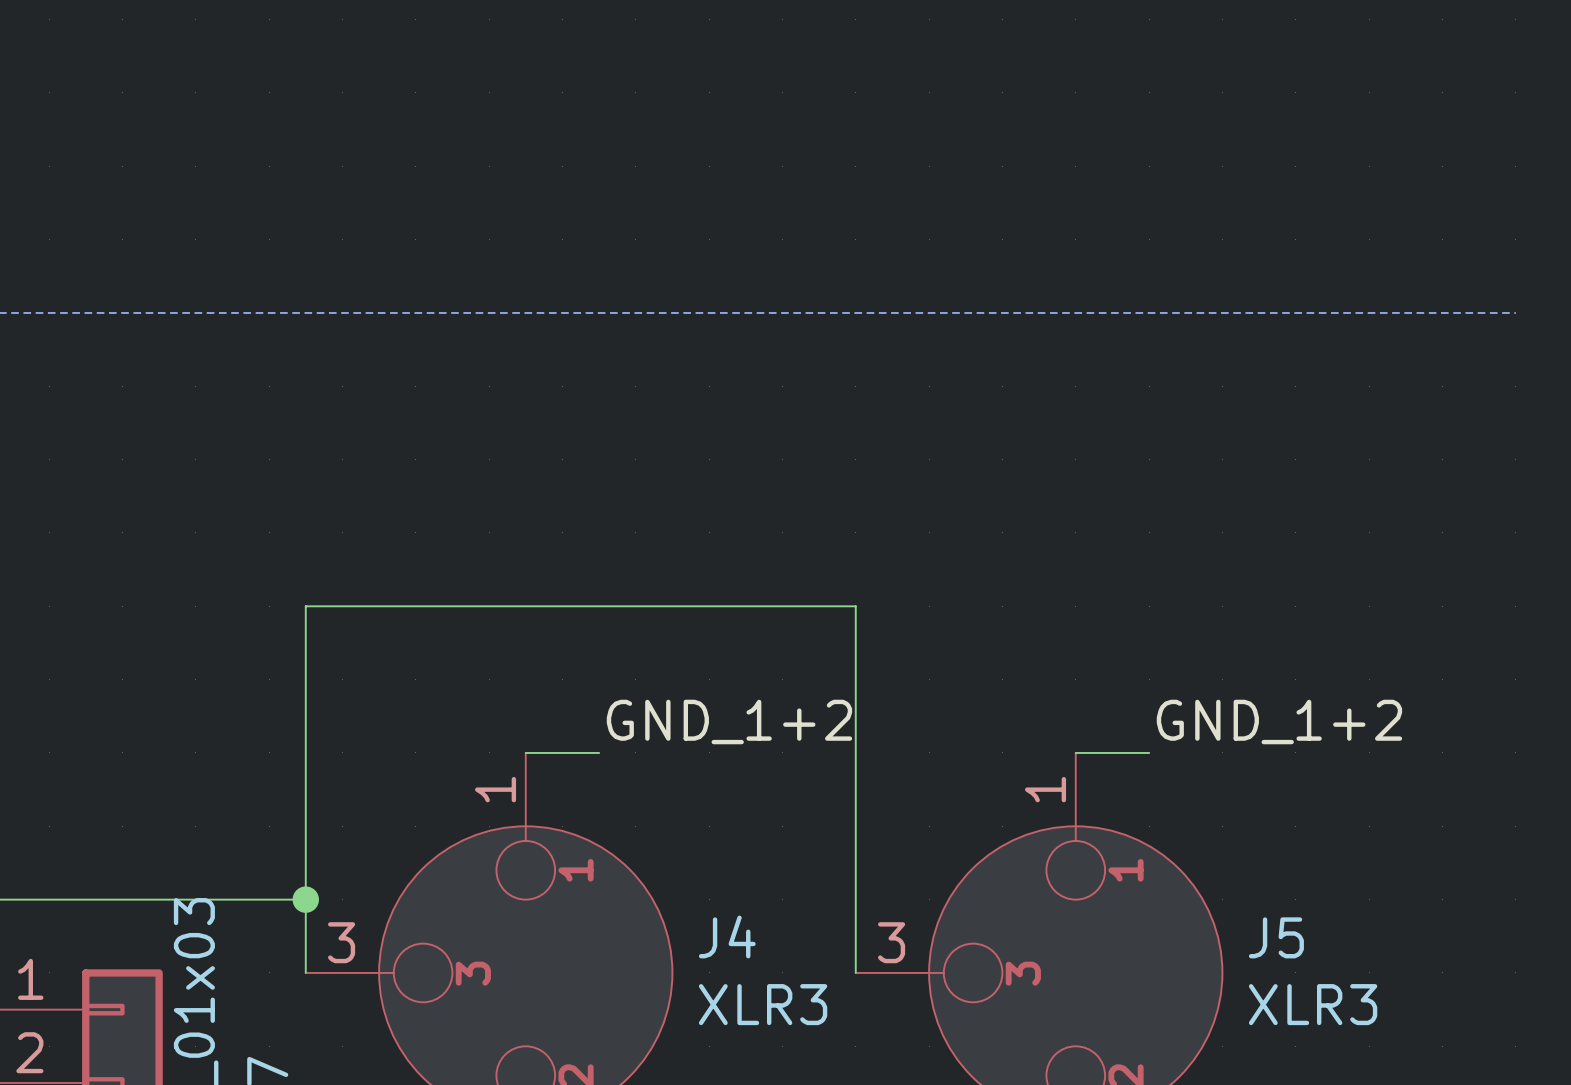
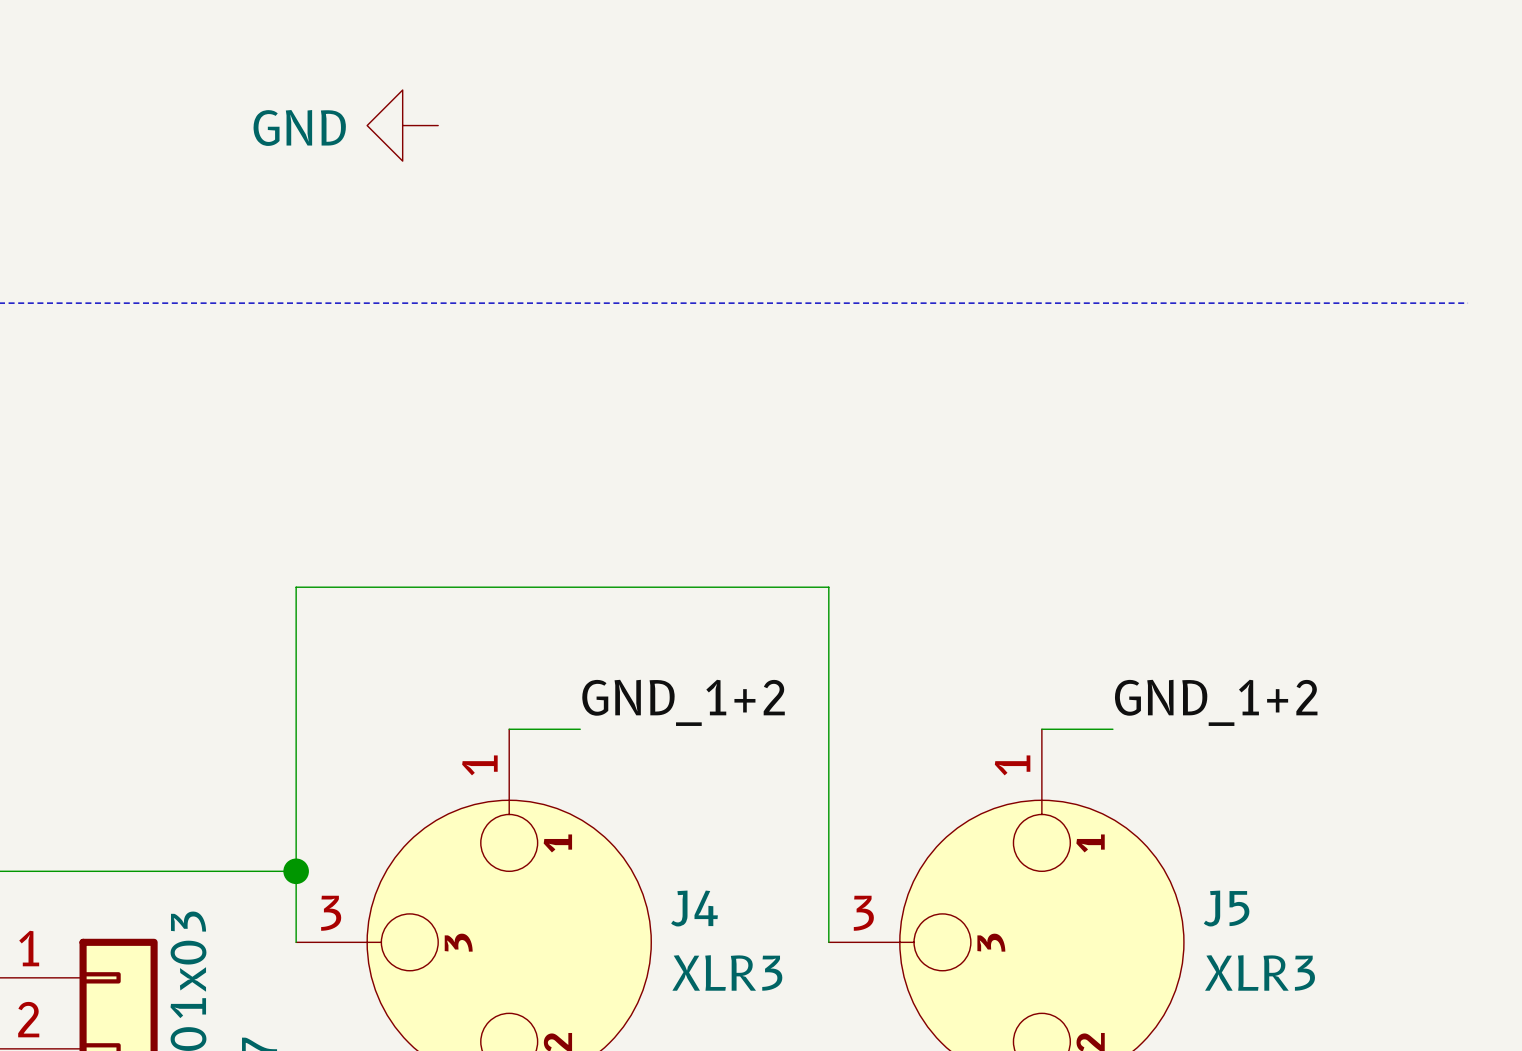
power symbol: none -> GND (402, 125)

